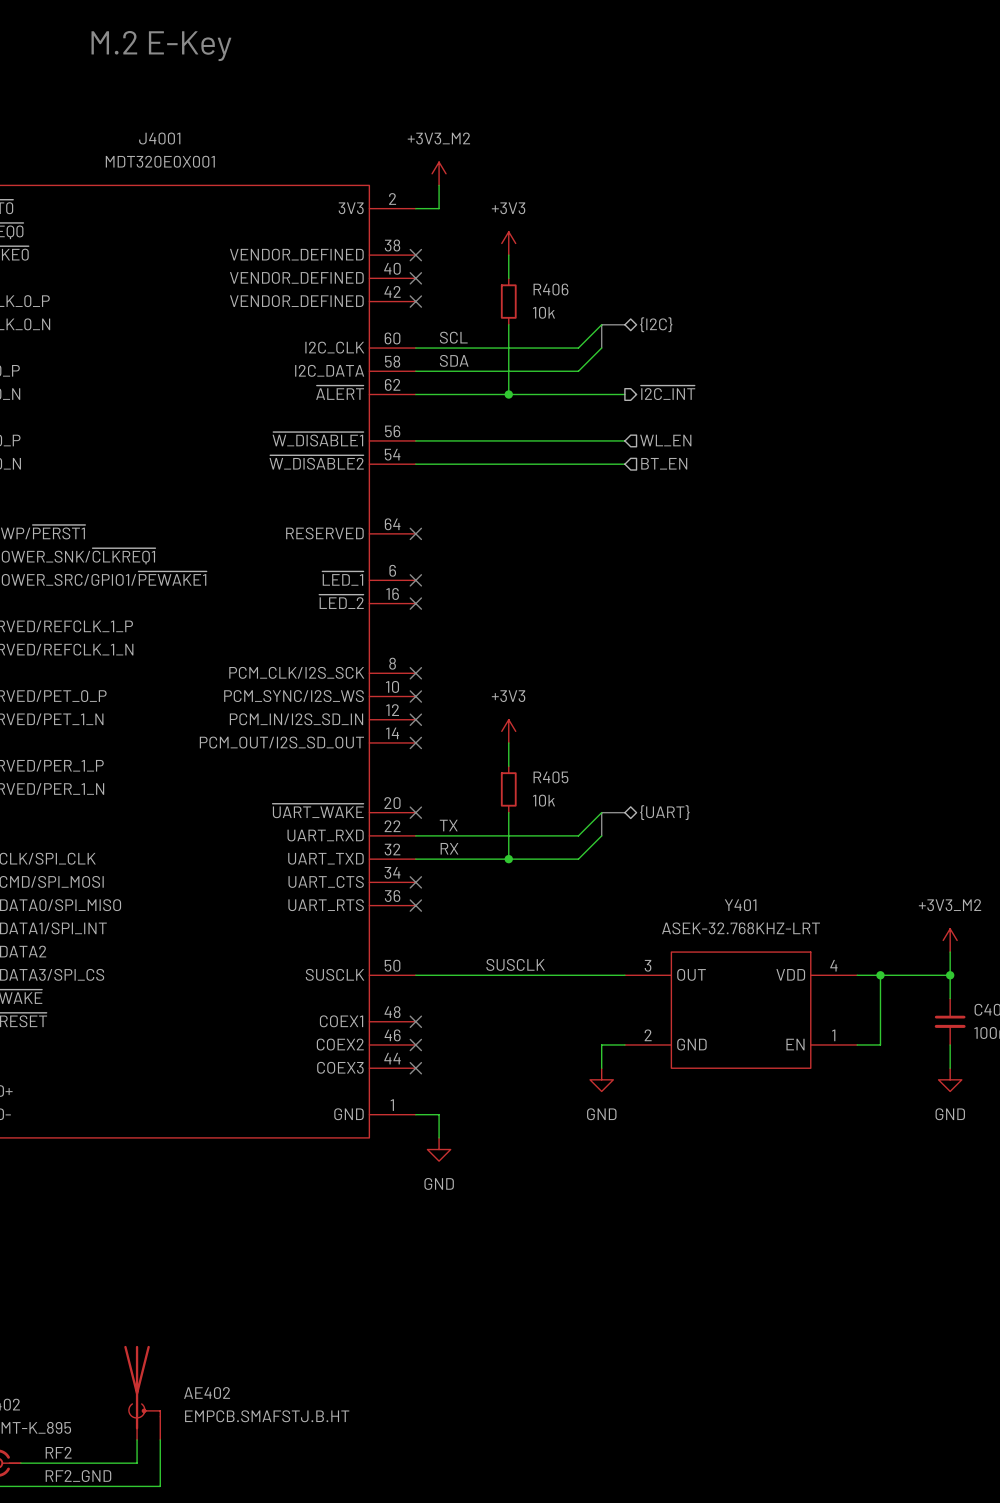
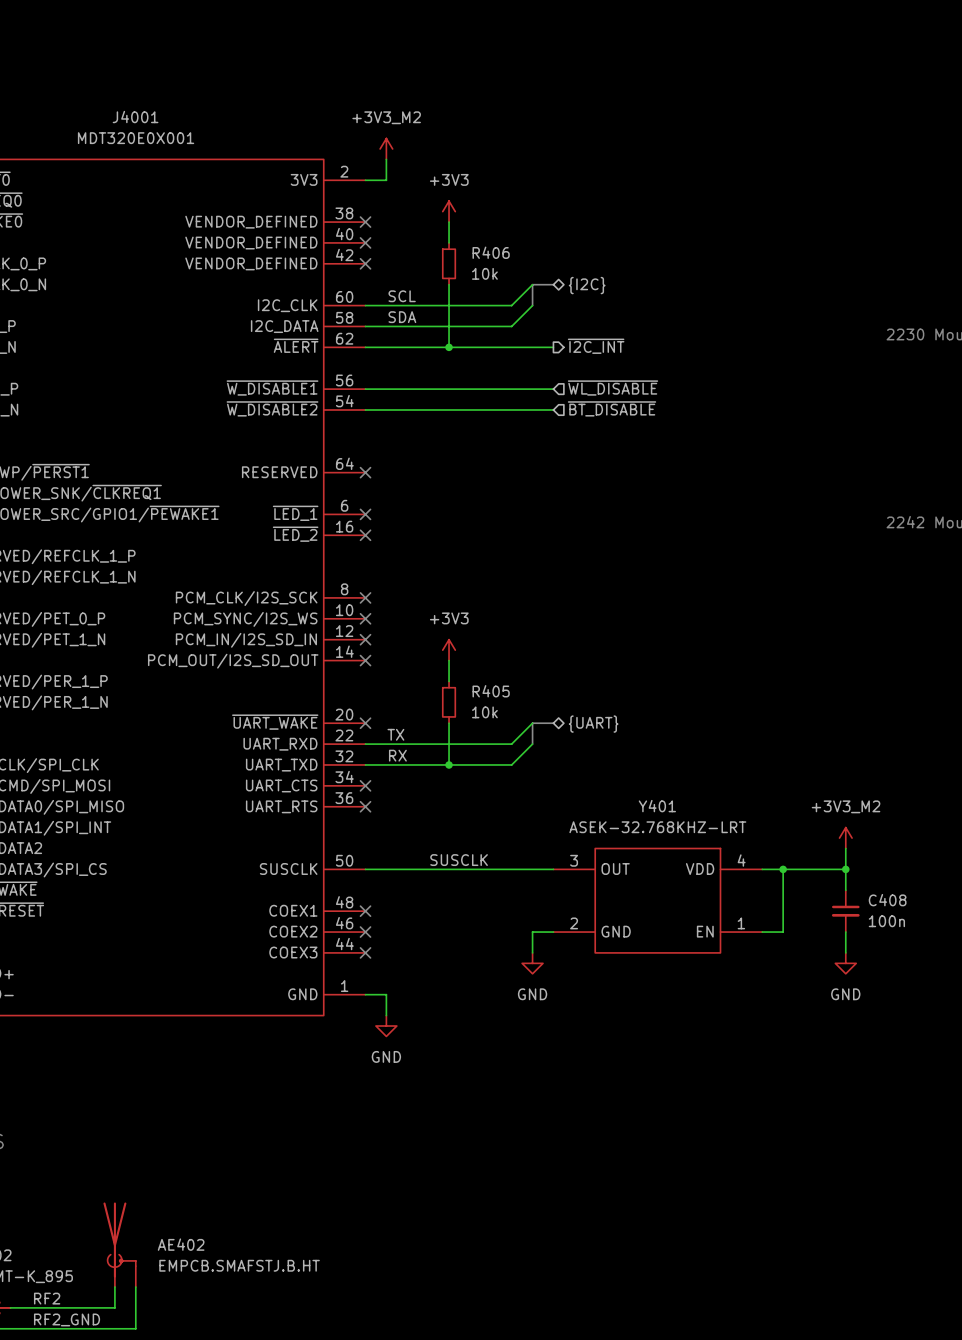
text: M.2 E-Key (161, 46) -> none
hierarchical label: WL_EN (665, 440) -> ~{WL_DISABLE} (613, 388)
hierarchical label: BT_EN (664, 463) -> ~{BT_DISABLE} (612, 408)

